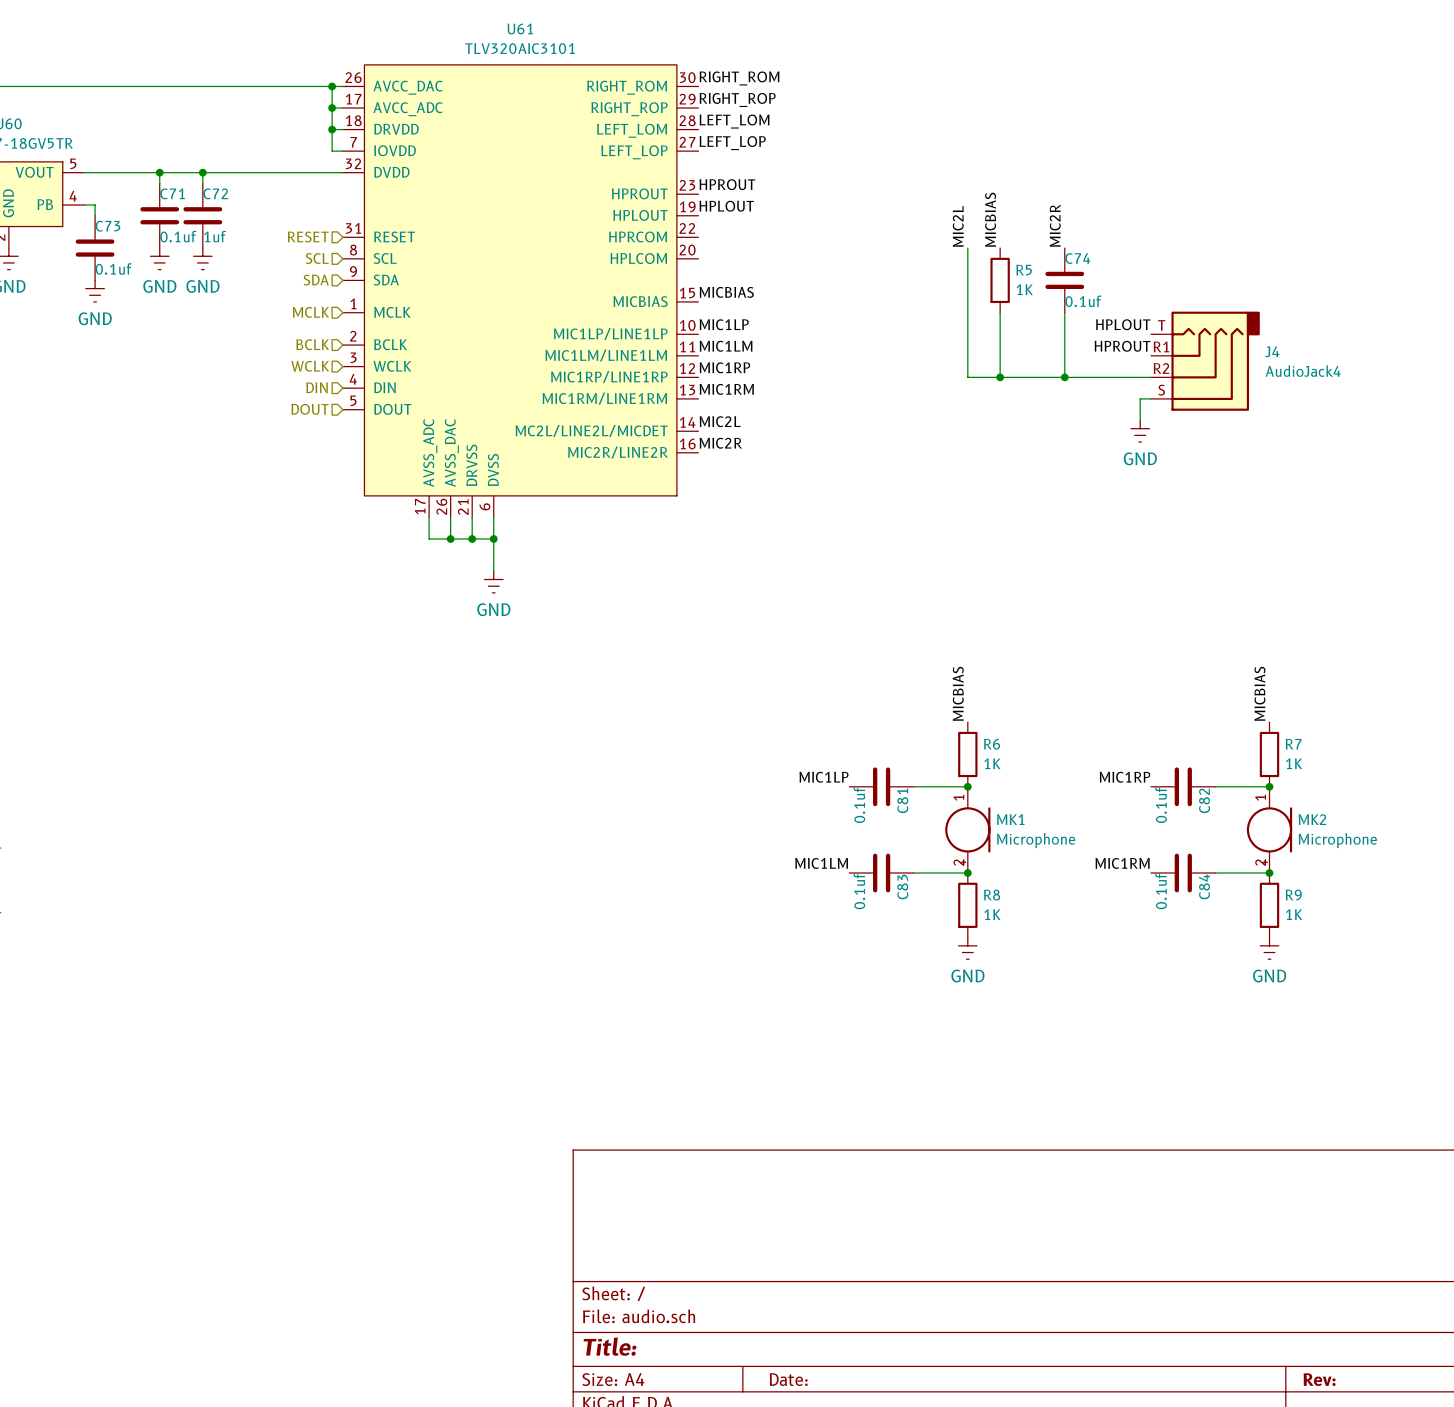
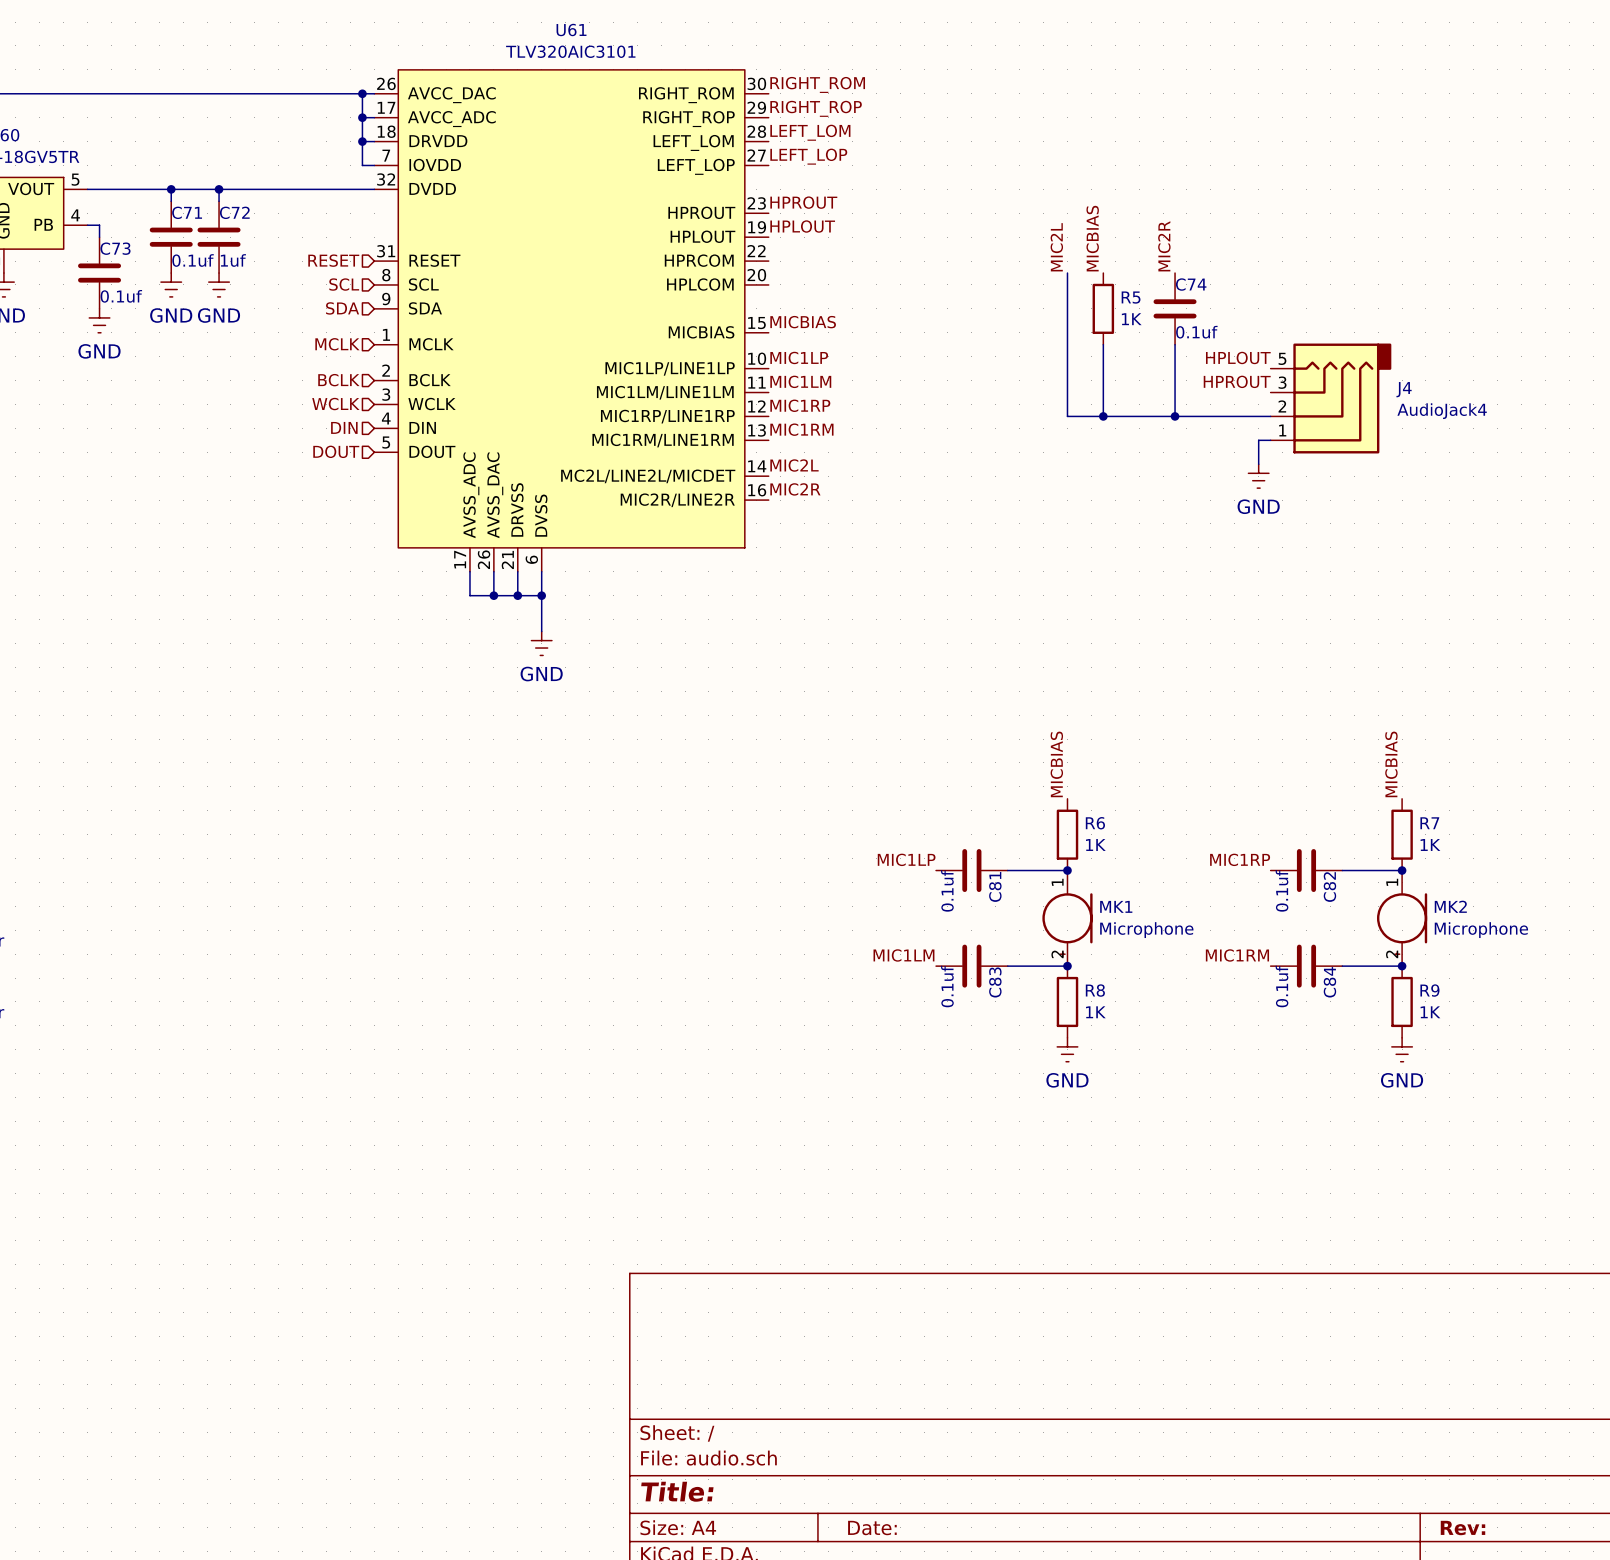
J4 pin number: T (1161, 325) -> 5 (1282, 358)
J4 pin number: R1 (1161, 346) -> 3 (1282, 382)
J4 pin number: R2 (1161, 368) -> 2 (1282, 406)
J4 pin number: S (1161, 390) -> 1 (1282, 430)

